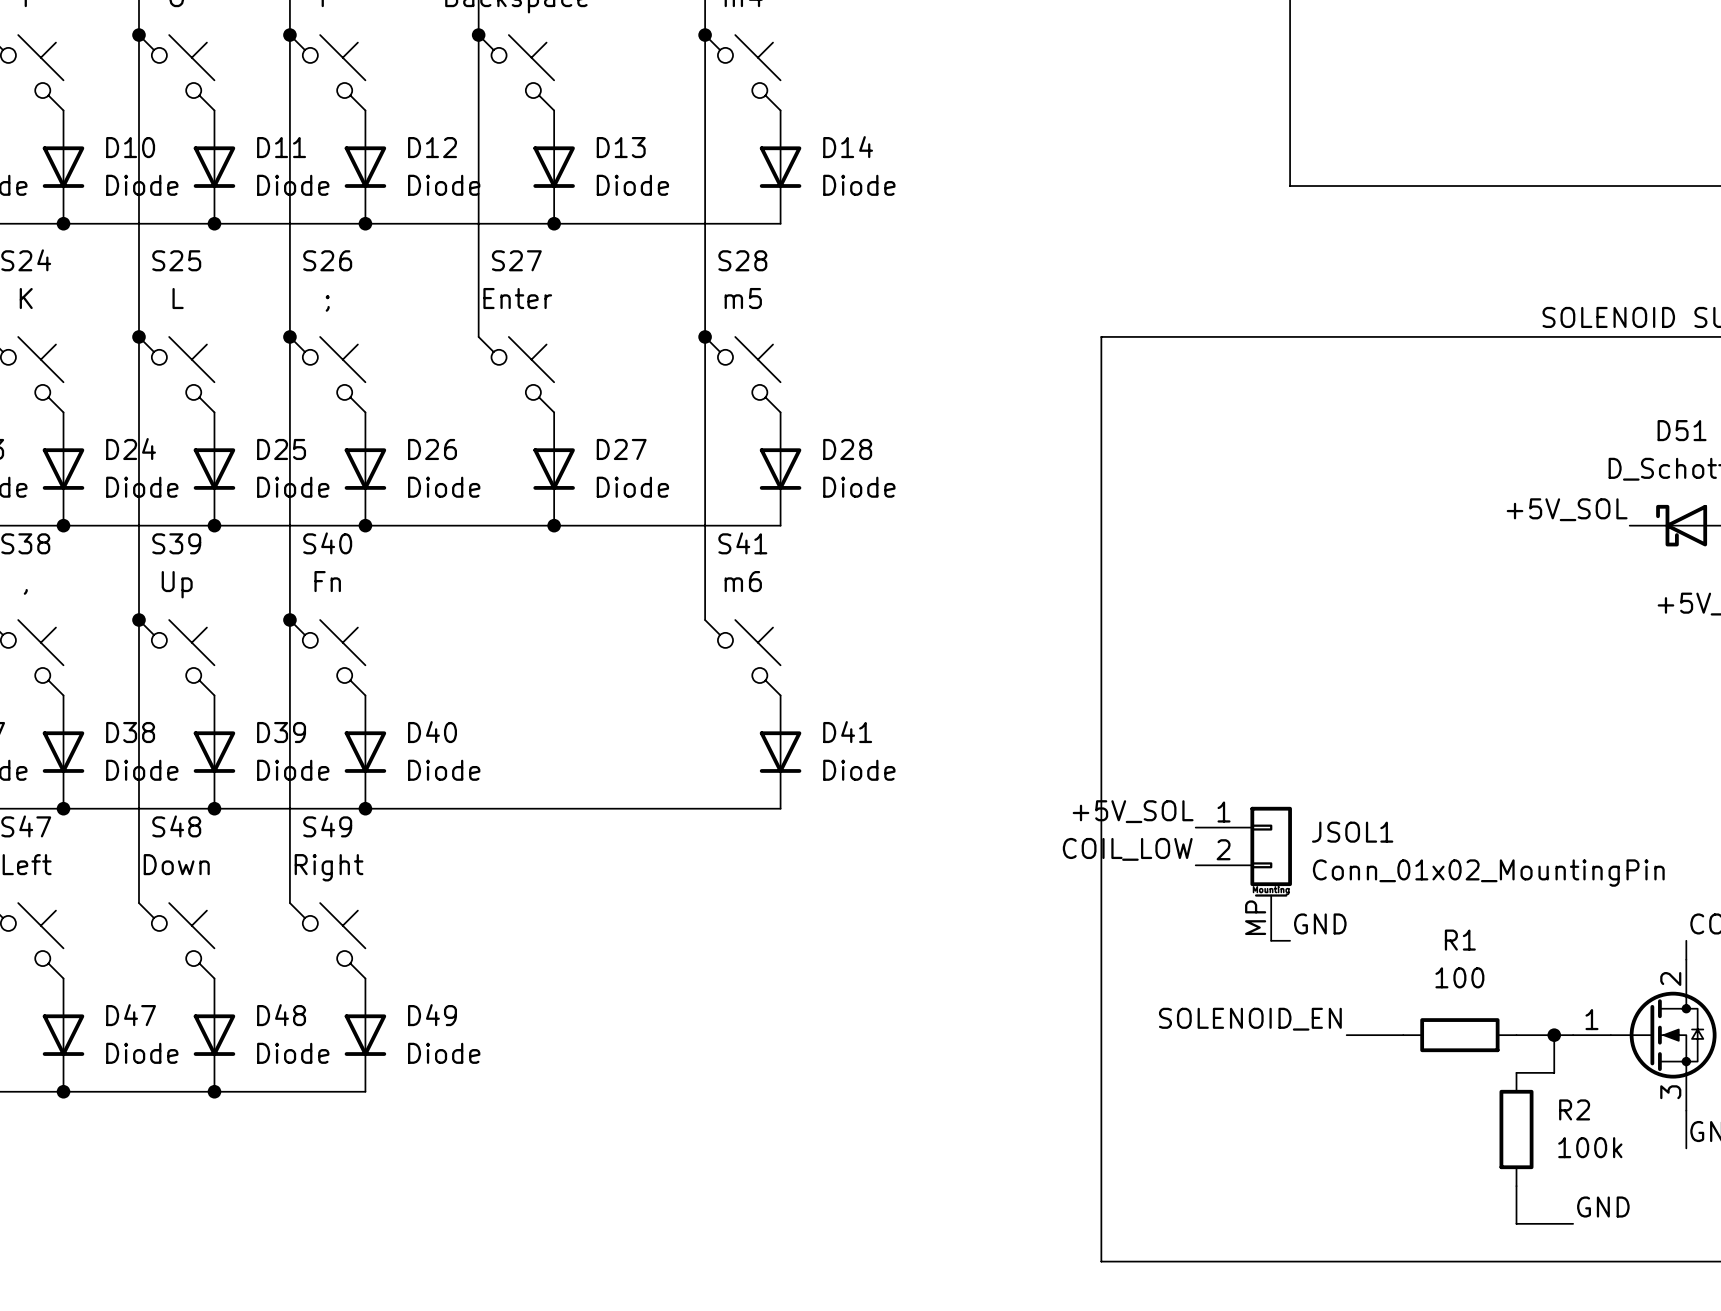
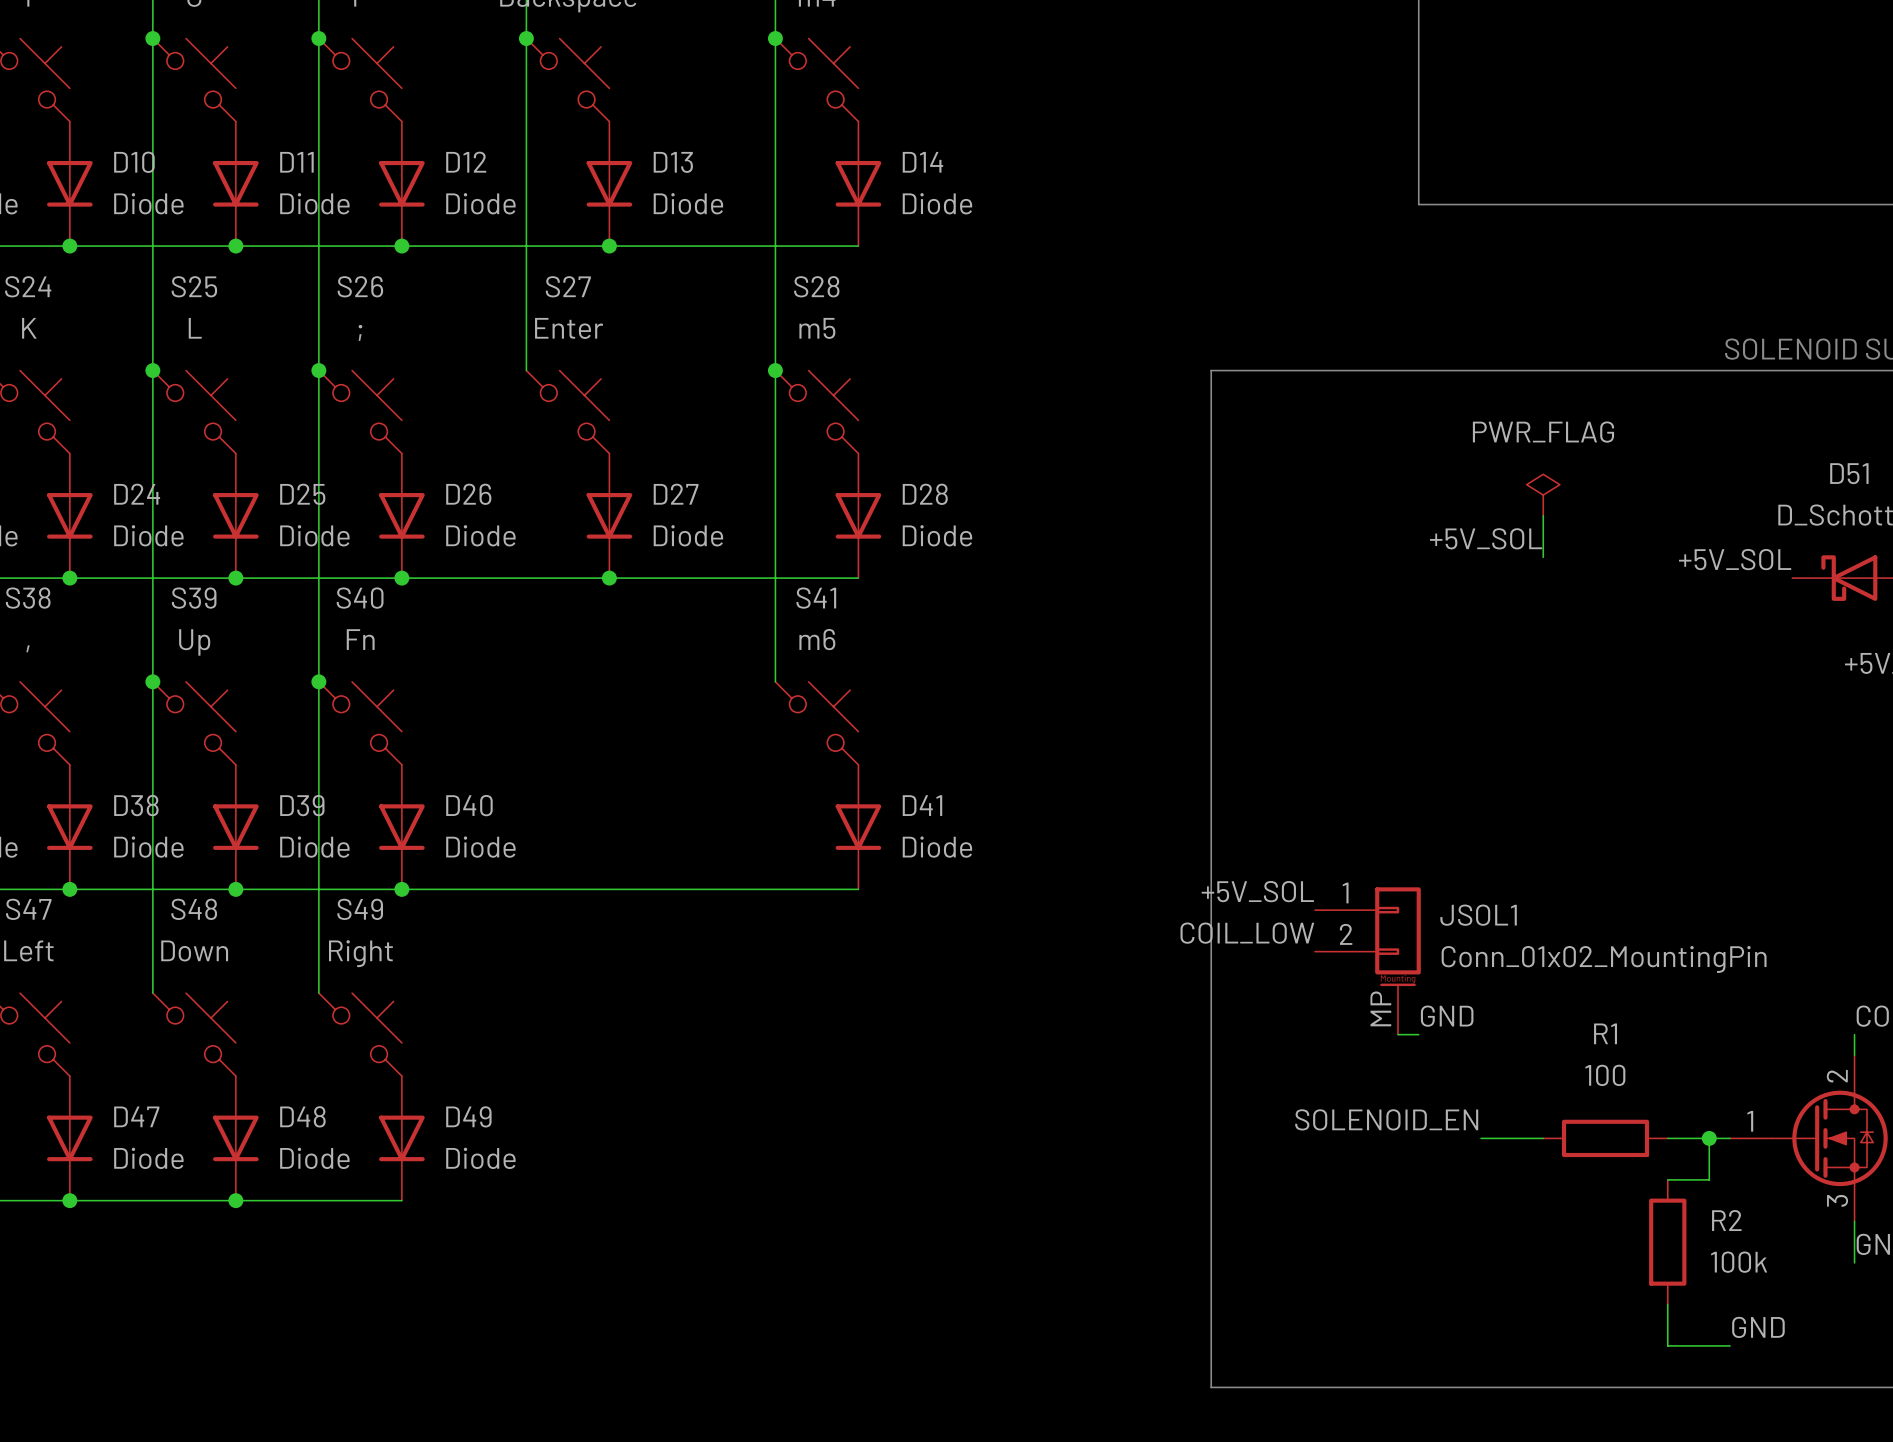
power symbol: none -> PWR_FLAG (1543, 495)
wire: none -> (1543, 515) (1543, 557)
label: none -> +5V_SOL (1486, 538)

